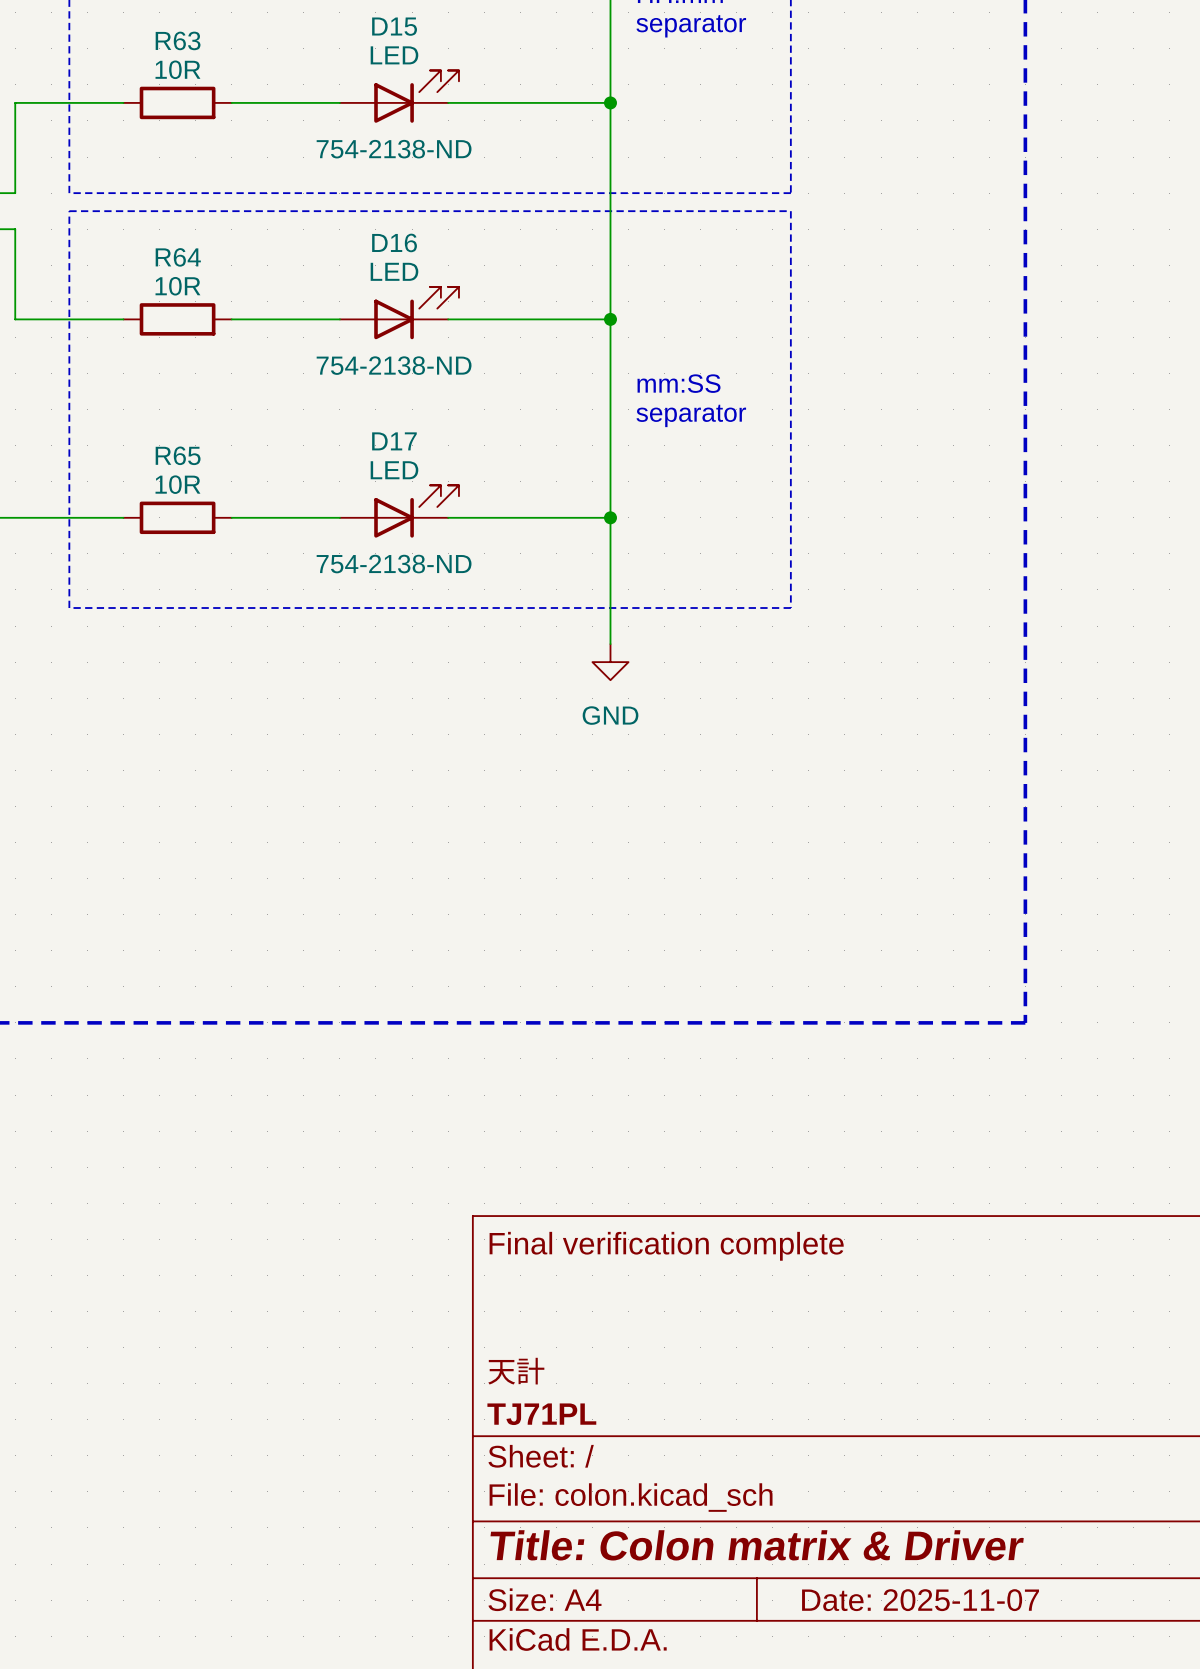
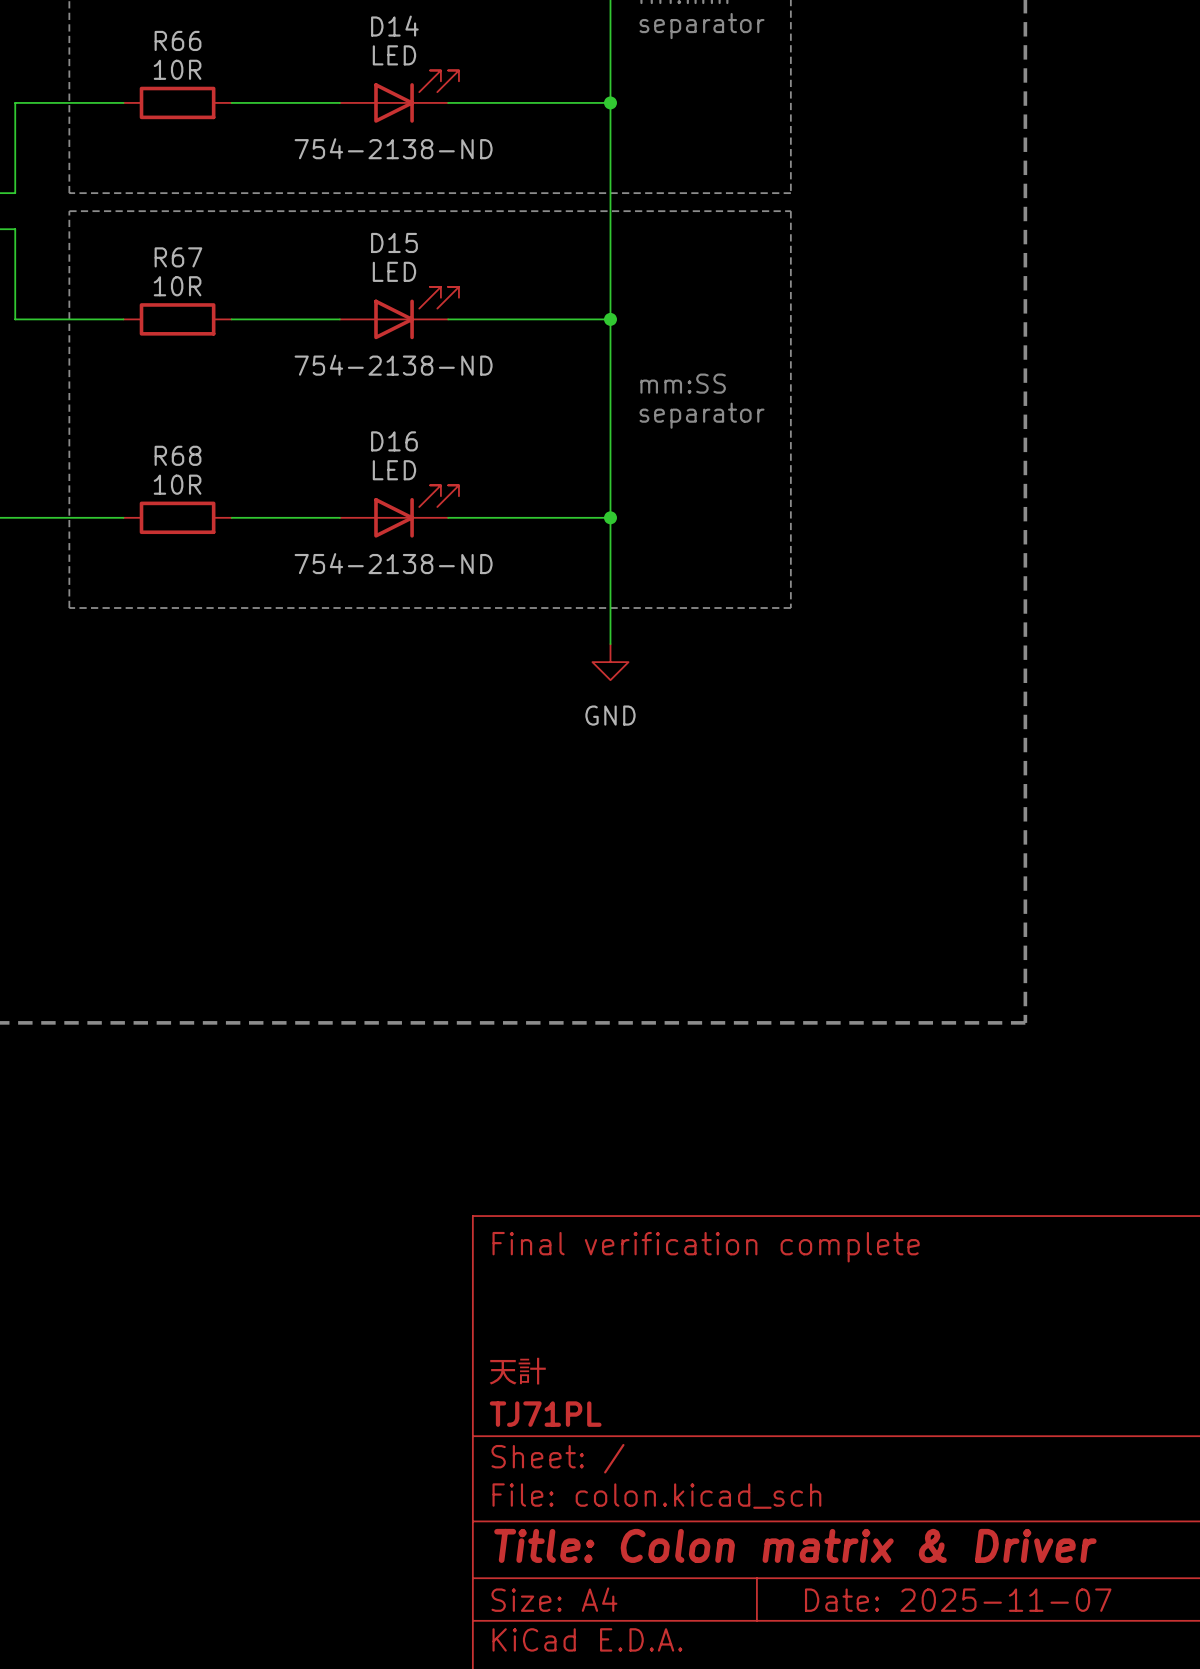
D15 name: D15 (394, 26) -> D14 (394, 26)
R63 name: R63 (178, 40) -> R66 (178, 40)
D16 name: D16 (394, 242) -> D15 (394, 242)
R64 name: R64 (178, 257) -> R67 (178, 257)
D17 name: D17 (394, 441) -> D16 (394, 441)
R65 name: R65 (178, 455) -> R68 (178, 455)

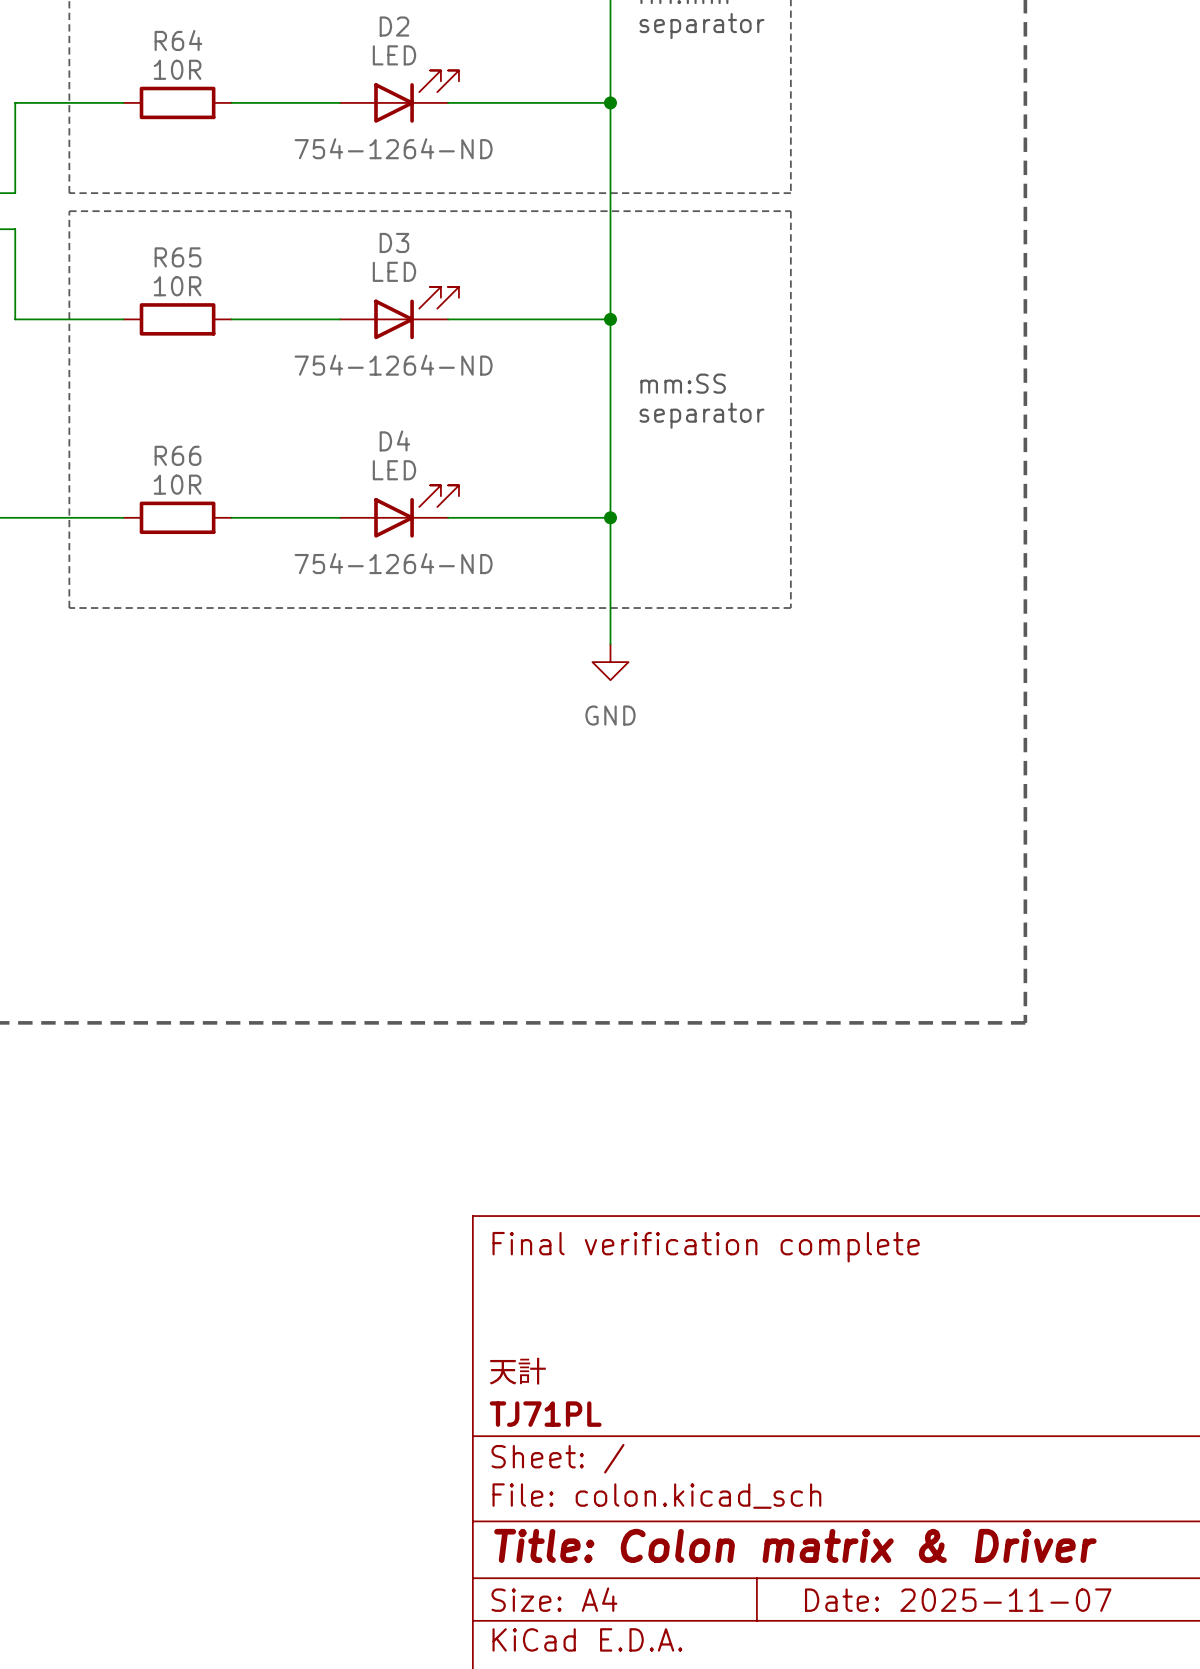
D14 name: D14 (394, 26) -> D2 (394, 26)
R66 name: R66 (178, 40) -> R64 (178, 40)
D14 text: 754-2138-ND (393, 148) -> 754-1264-ND (393, 148)
D15 name: D15 (394, 242) -> D3 (394, 242)
R67 name: R67 (178, 257) -> R65 (178, 257)
D15 text: 754-2138-ND (393, 365) -> 754-1264-ND (393, 365)
D16 name: D16 (394, 441) -> D4 (394, 440)
R68 name: R68 (178, 455) -> R66 (178, 455)
D16 text: 754-2138-ND (393, 563) -> 754-1264-ND (393, 563)

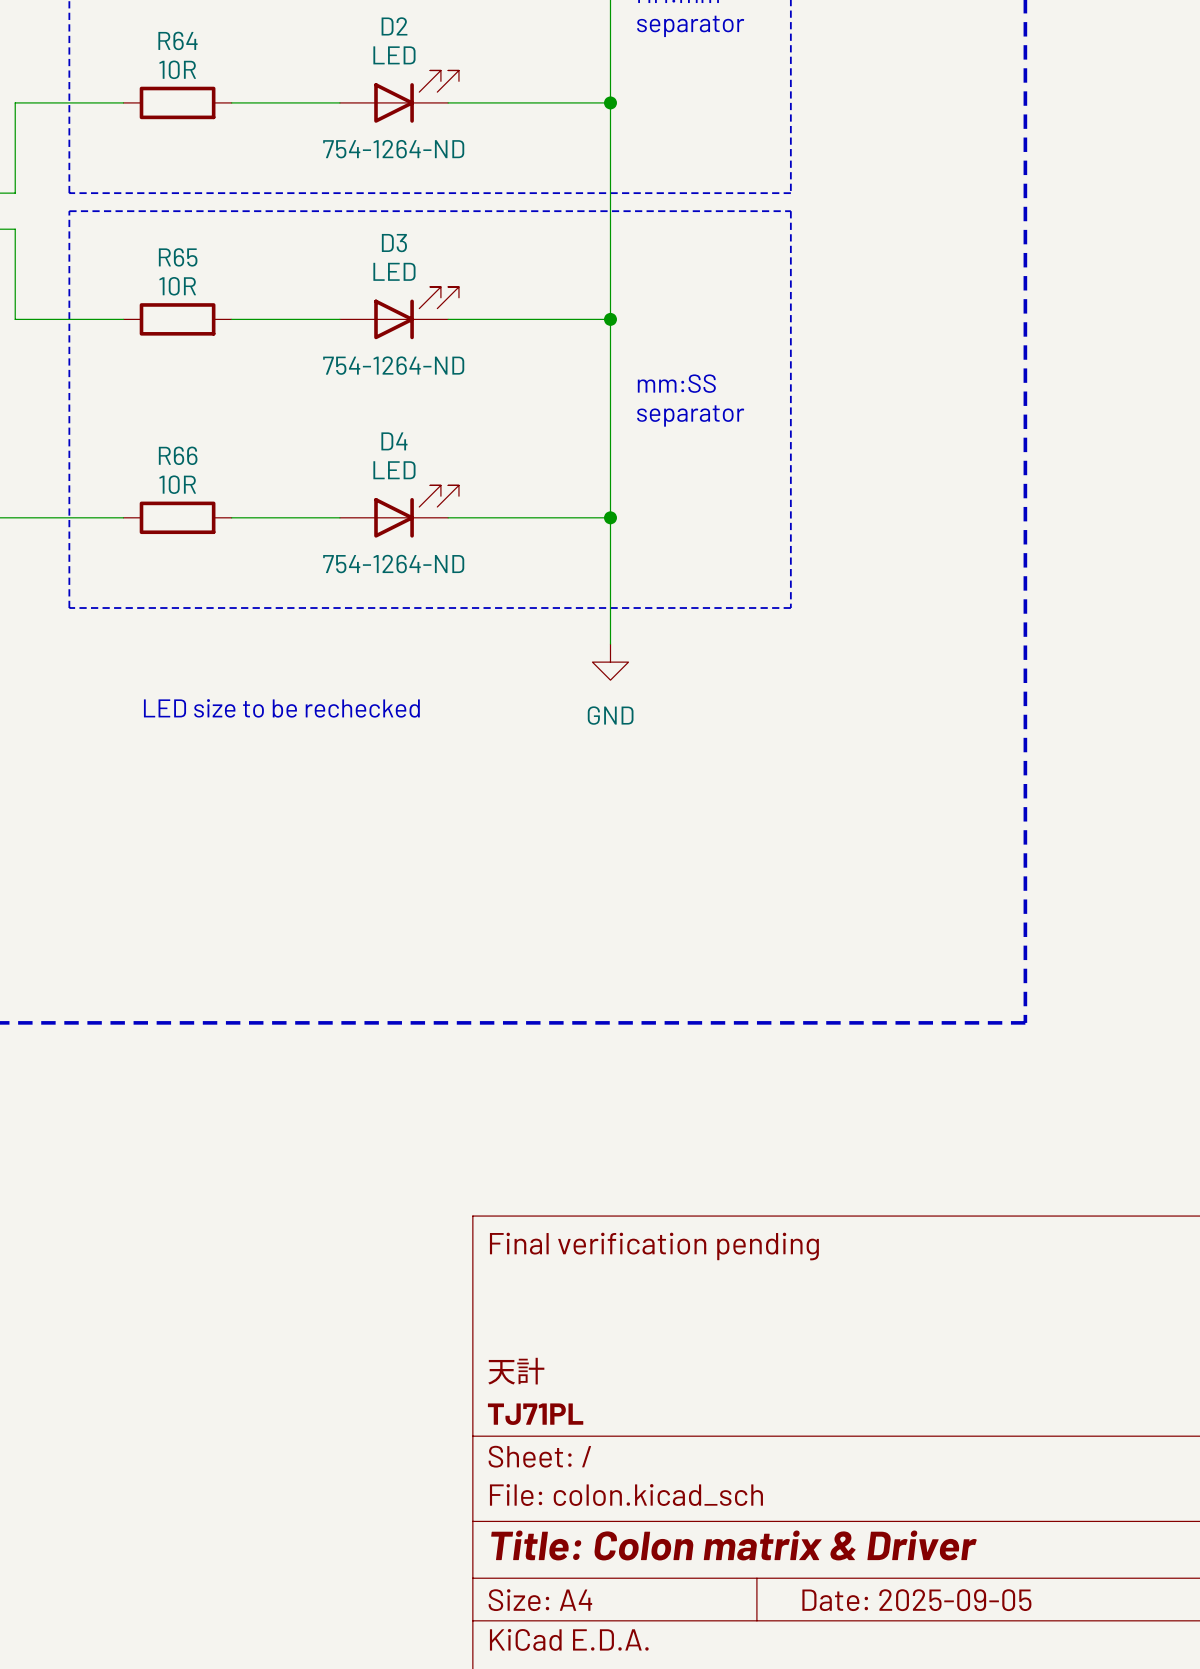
text: none -> LED size to be rechecked (281, 708)
title block: Final verification complete (706, 1247) -> Final verification pending (654, 1246)
title block: Date: 2025-11-07 (958, 1600) -> Date: 2025-09-05 (916, 1600)

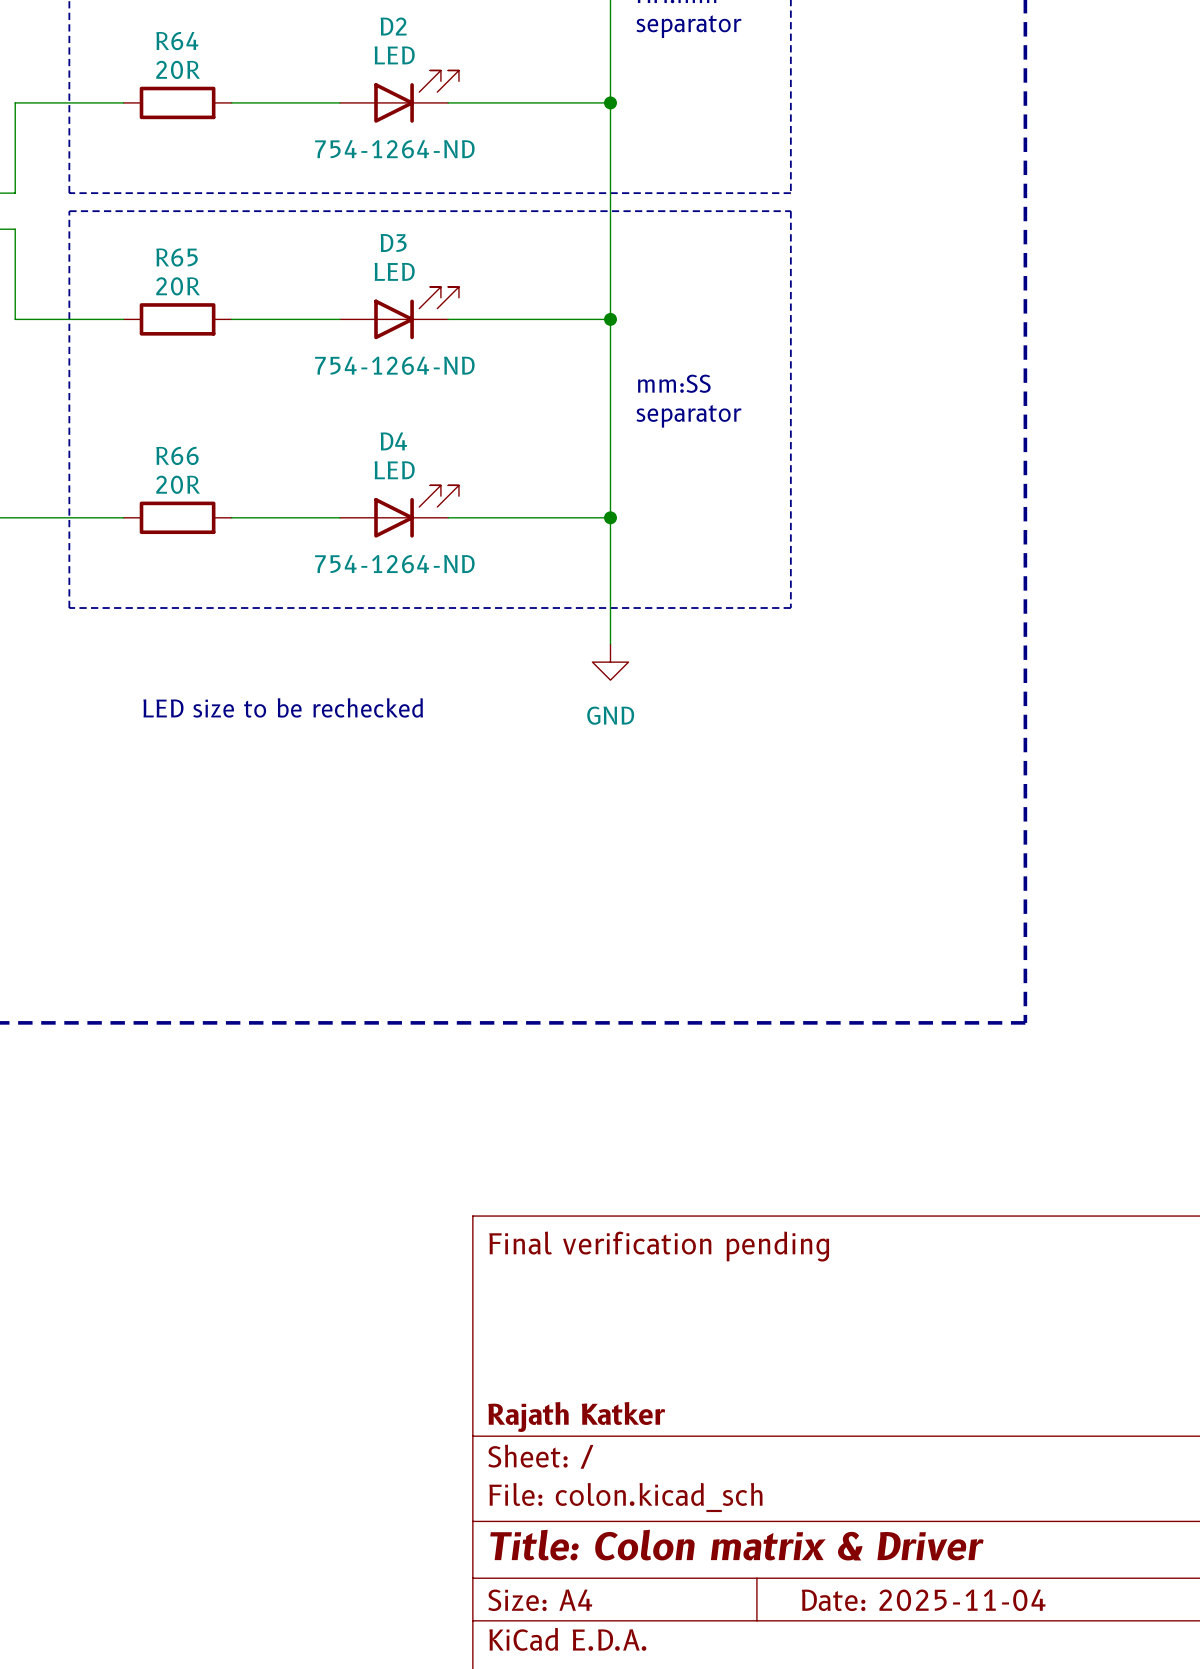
R64 value: 10R (177, 69) -> 20R (178, 69)
R65 value: 10R (177, 286) -> 20R (178, 286)
R66 value: 10R (177, 484) -> 20R (178, 484)
title block: 天計 (516, 1371) -> none
title block: TJ71PL (535, 1414) -> Rajath Katker (576, 1416)
title block: Date: 2025-09-05 (916, 1600) -> Date: 2025-11-04 (923, 1600)

